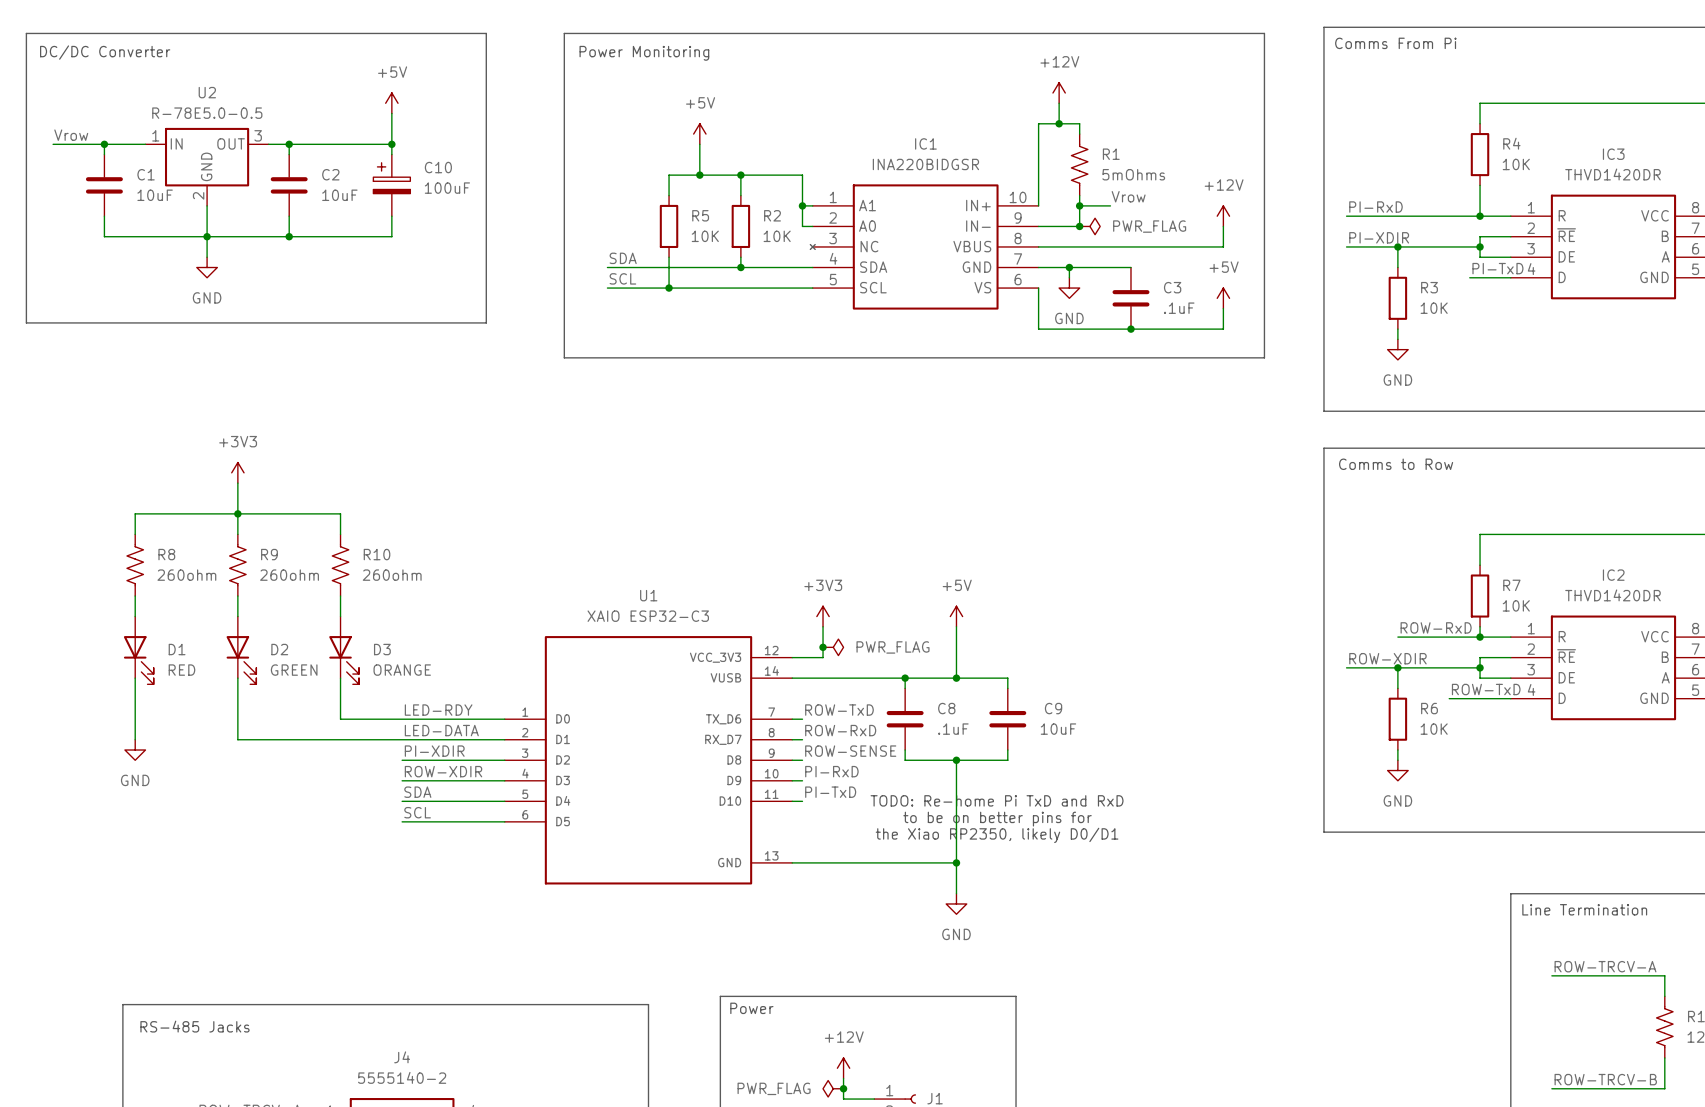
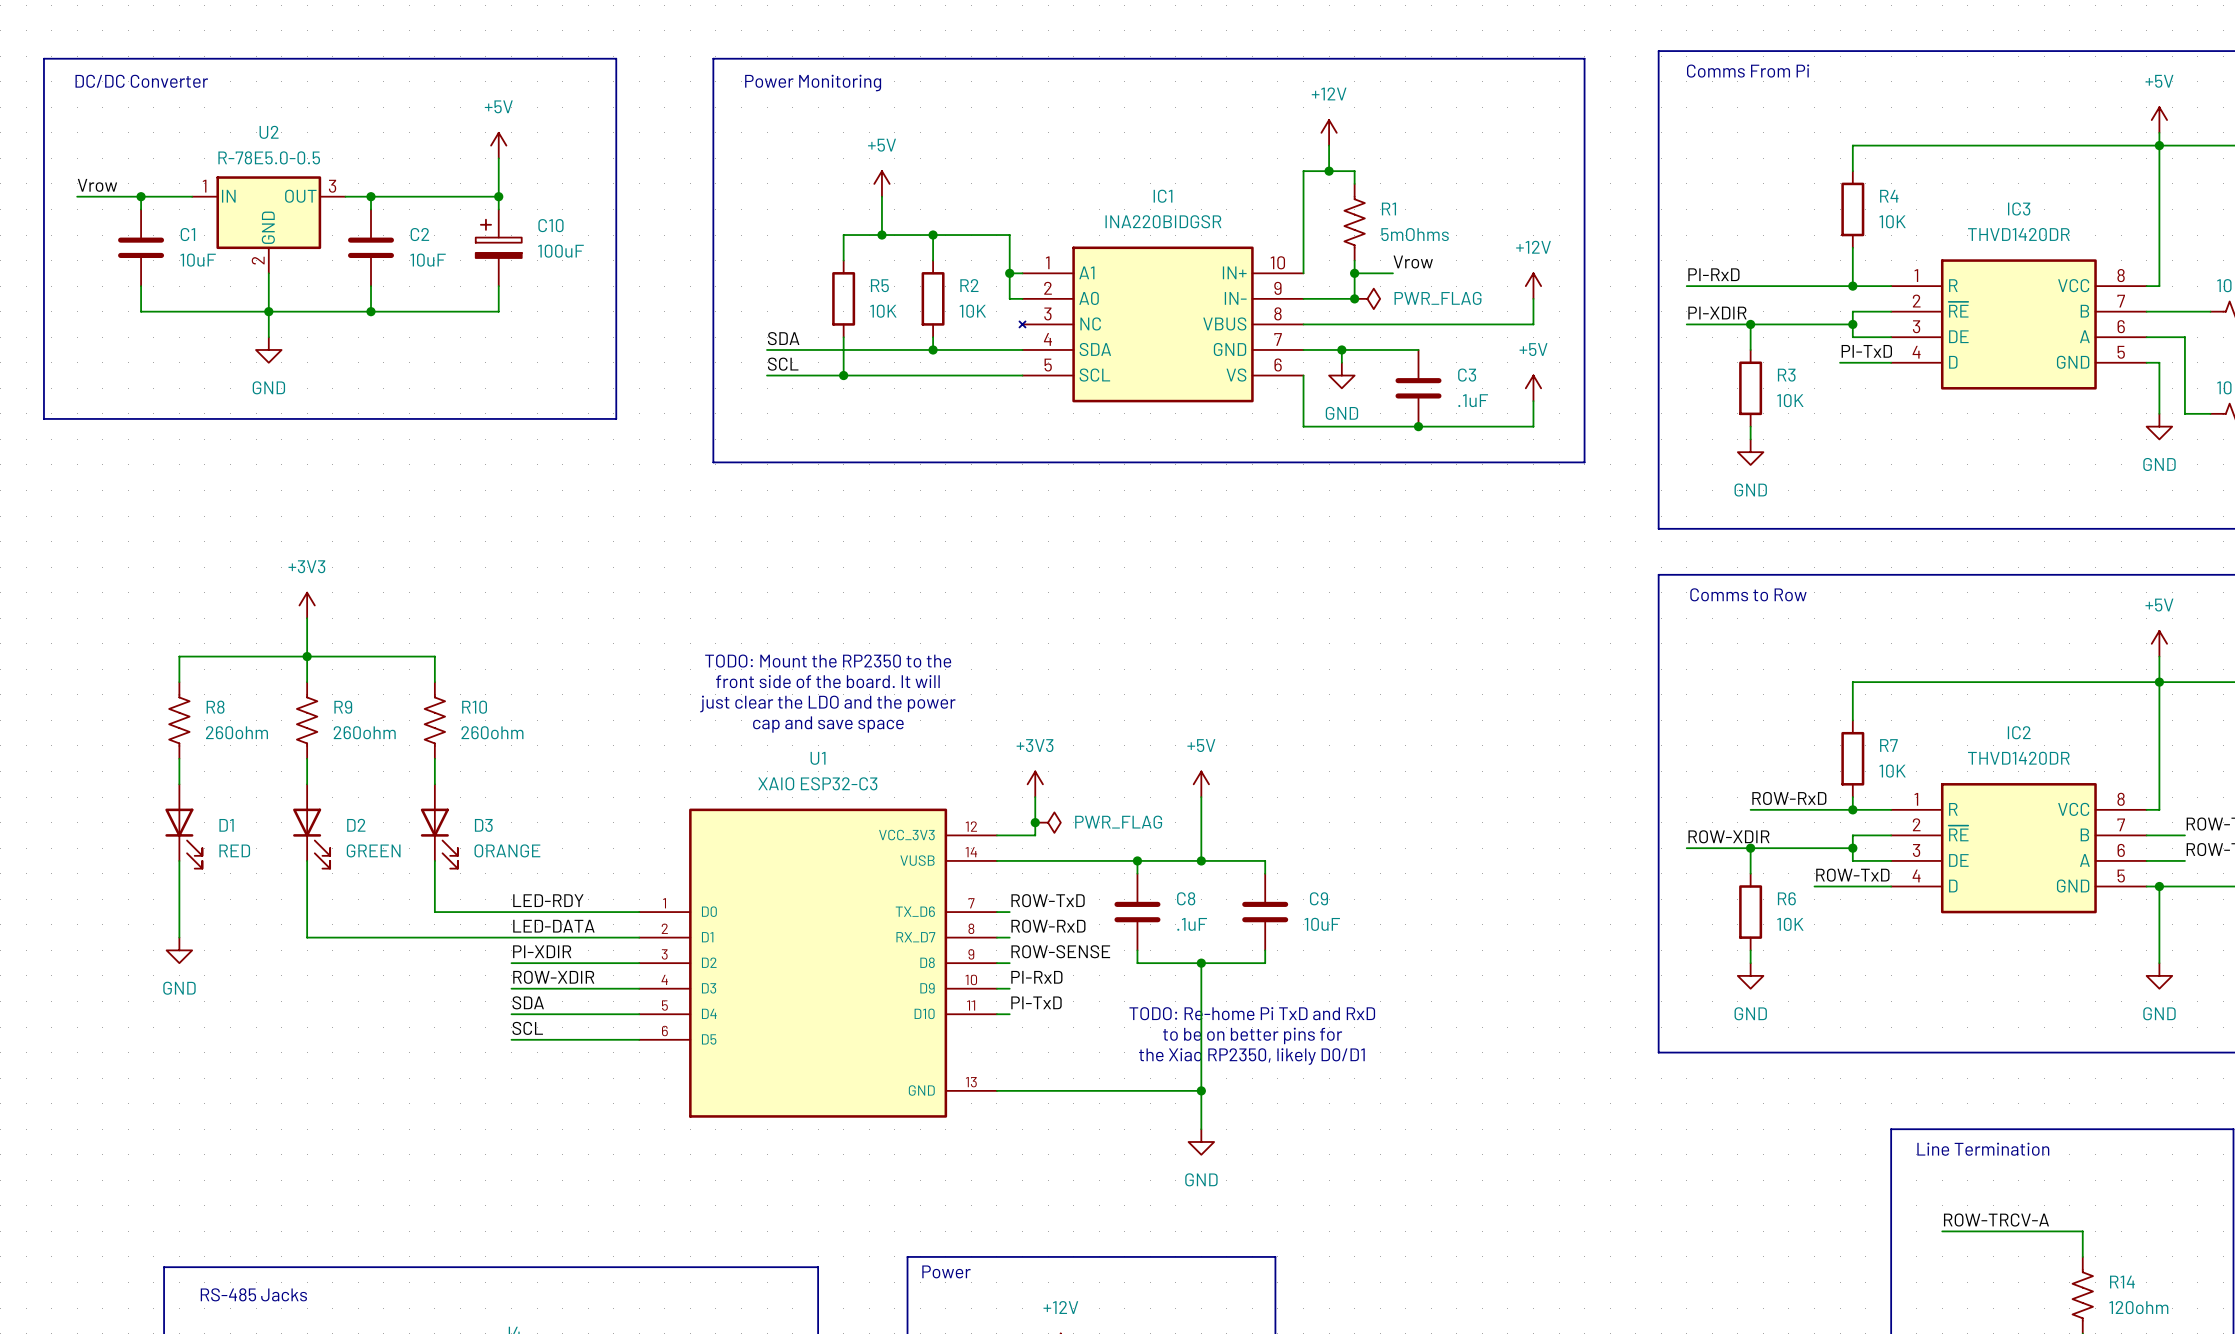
text: none -> TODO: Mount the RP2350 to the (828, 661)
text: none -> front side of the board. It will (827, 681)
text: none -> just clear the LDO and the power (827, 703)
text: none -> cap and save space (828, 724)

